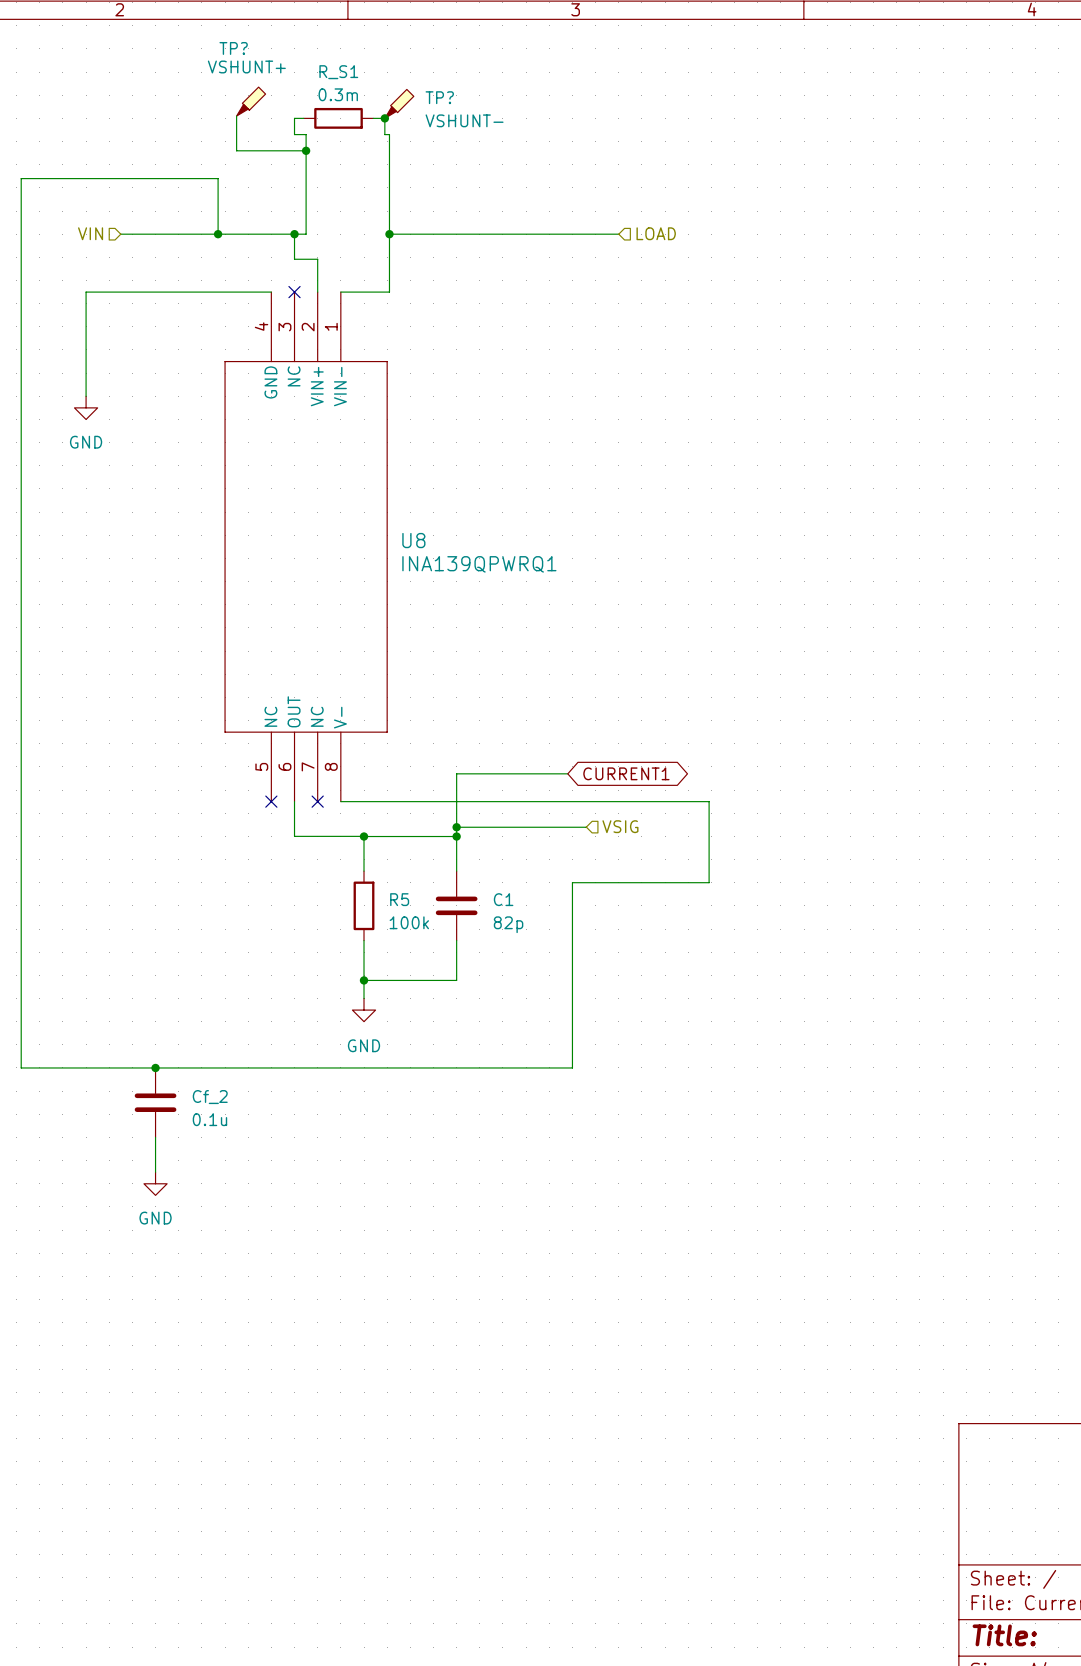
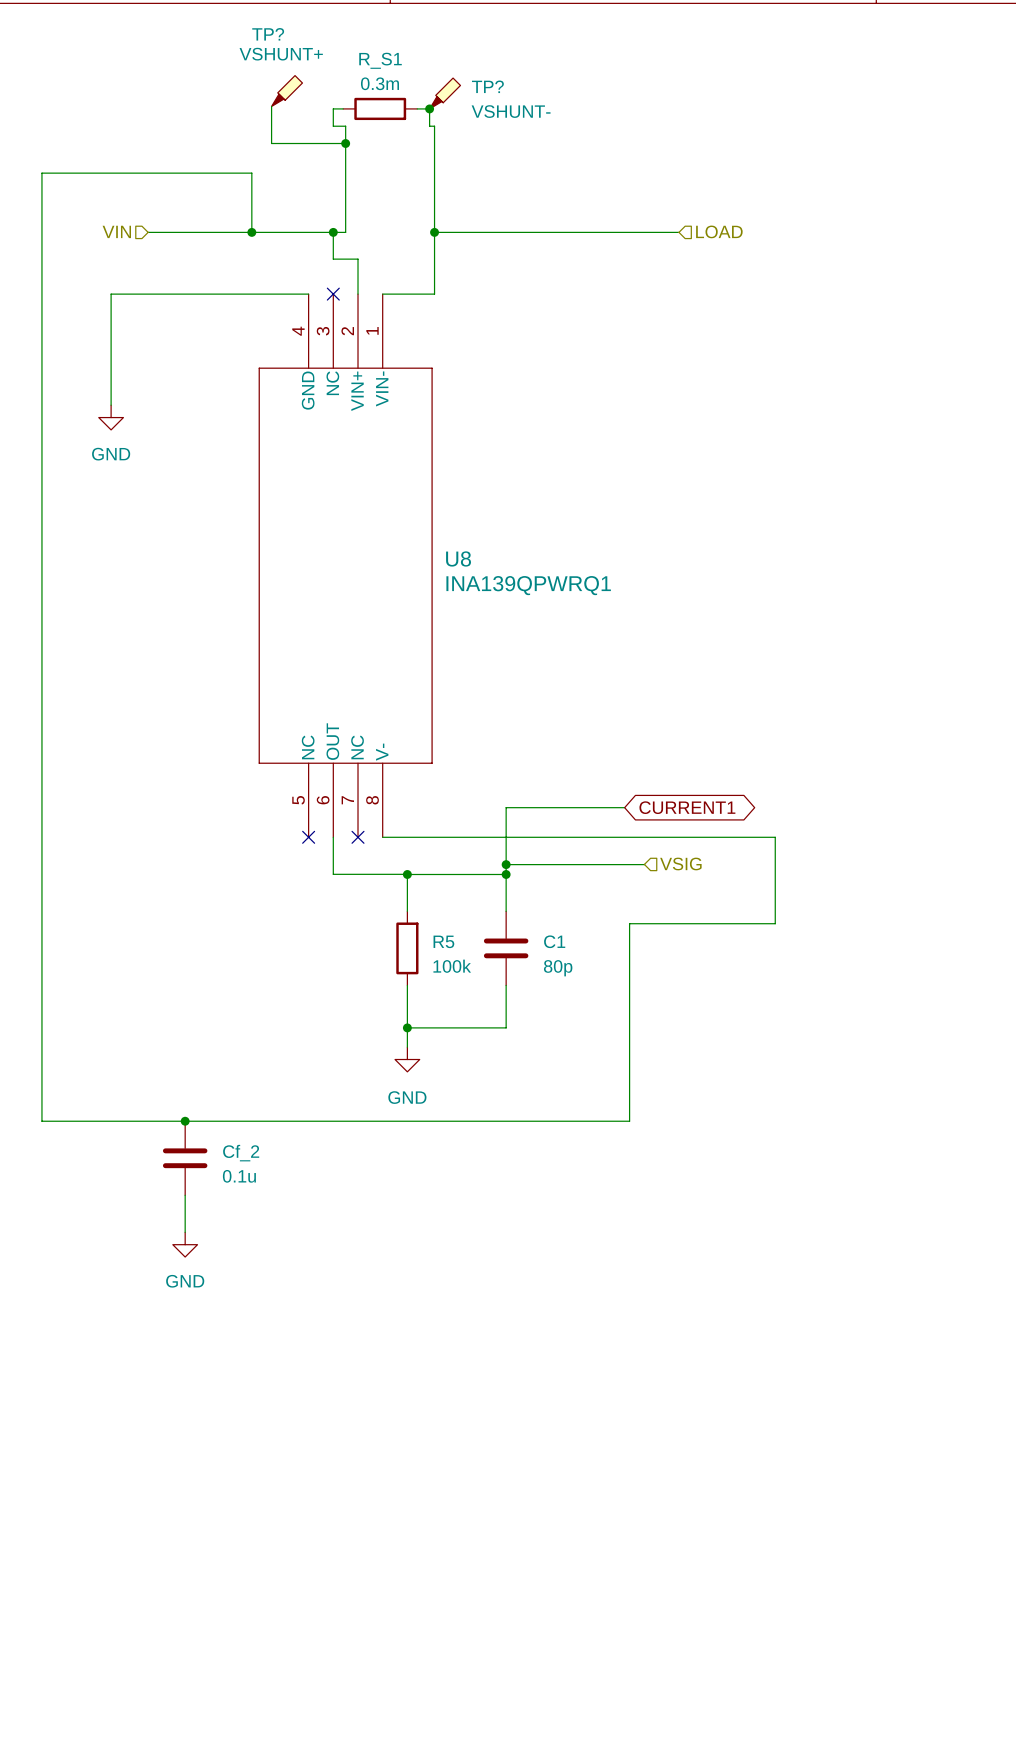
C1 value: 82p (508, 924) -> 80p (558, 968)

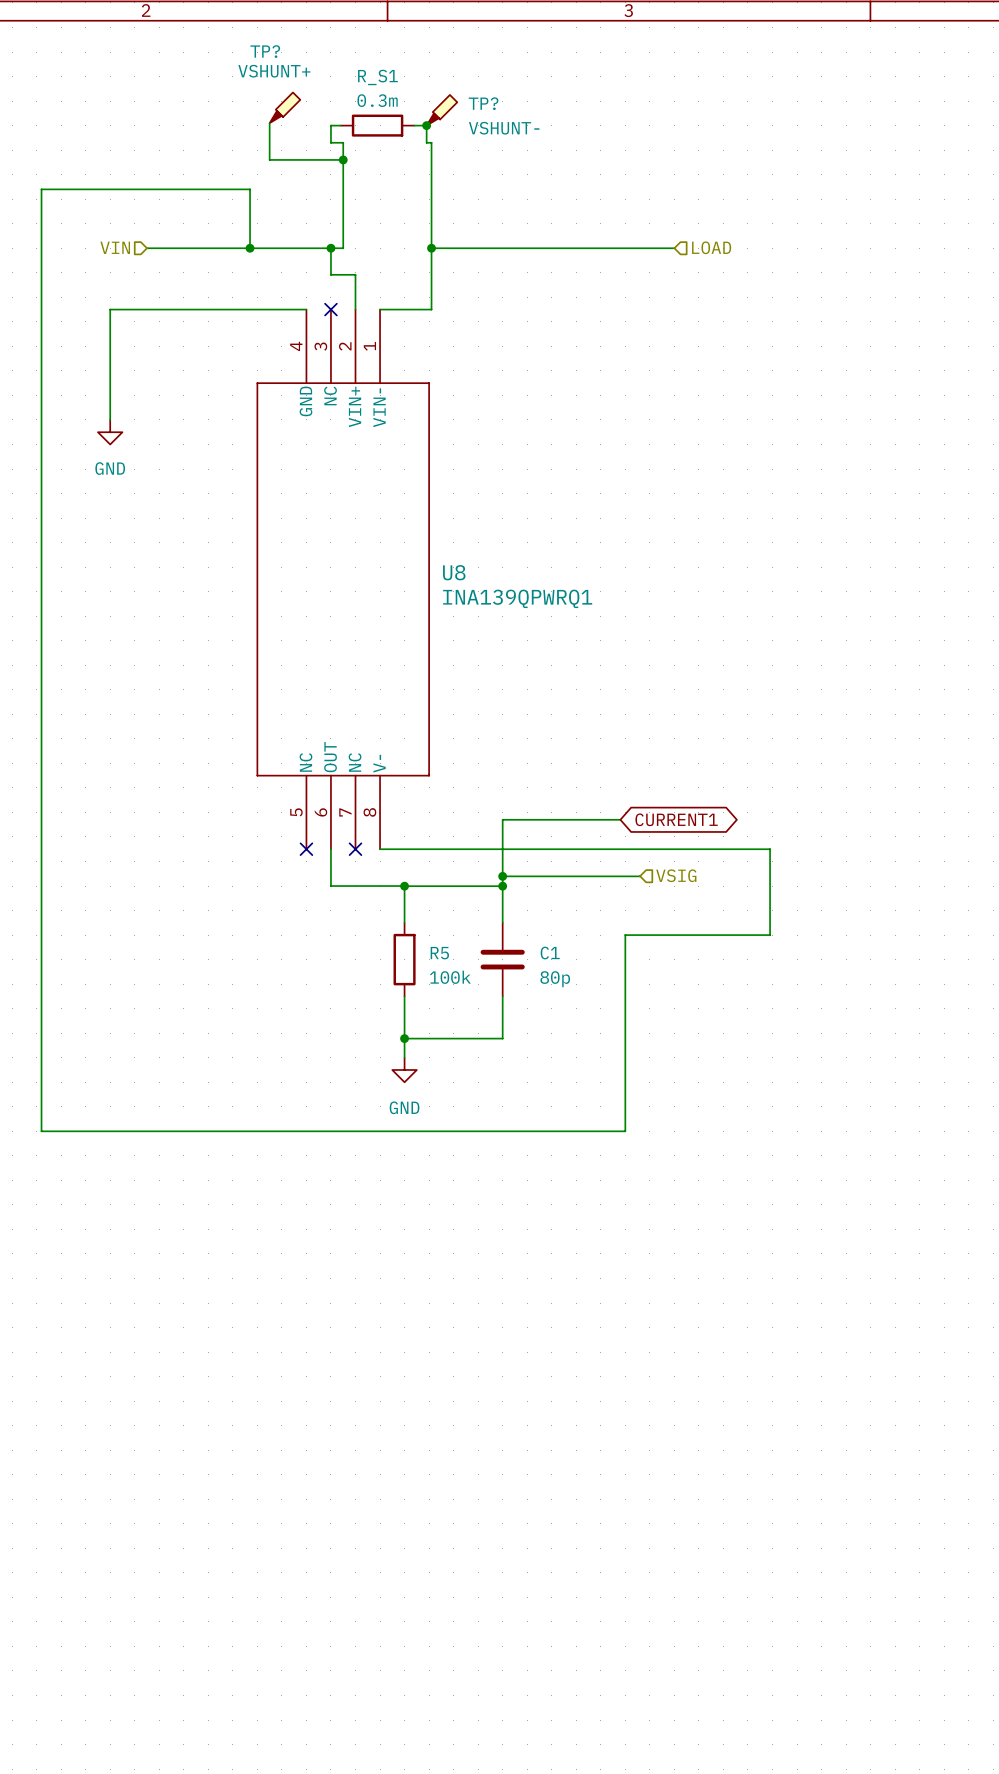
junction: (185, 1121) -> none
Cf_2: 0.1u (185, 1158) -> none
wire: (185, 1195) (185, 1232) -> none
power symbol: GND (185, 1244) -> none

